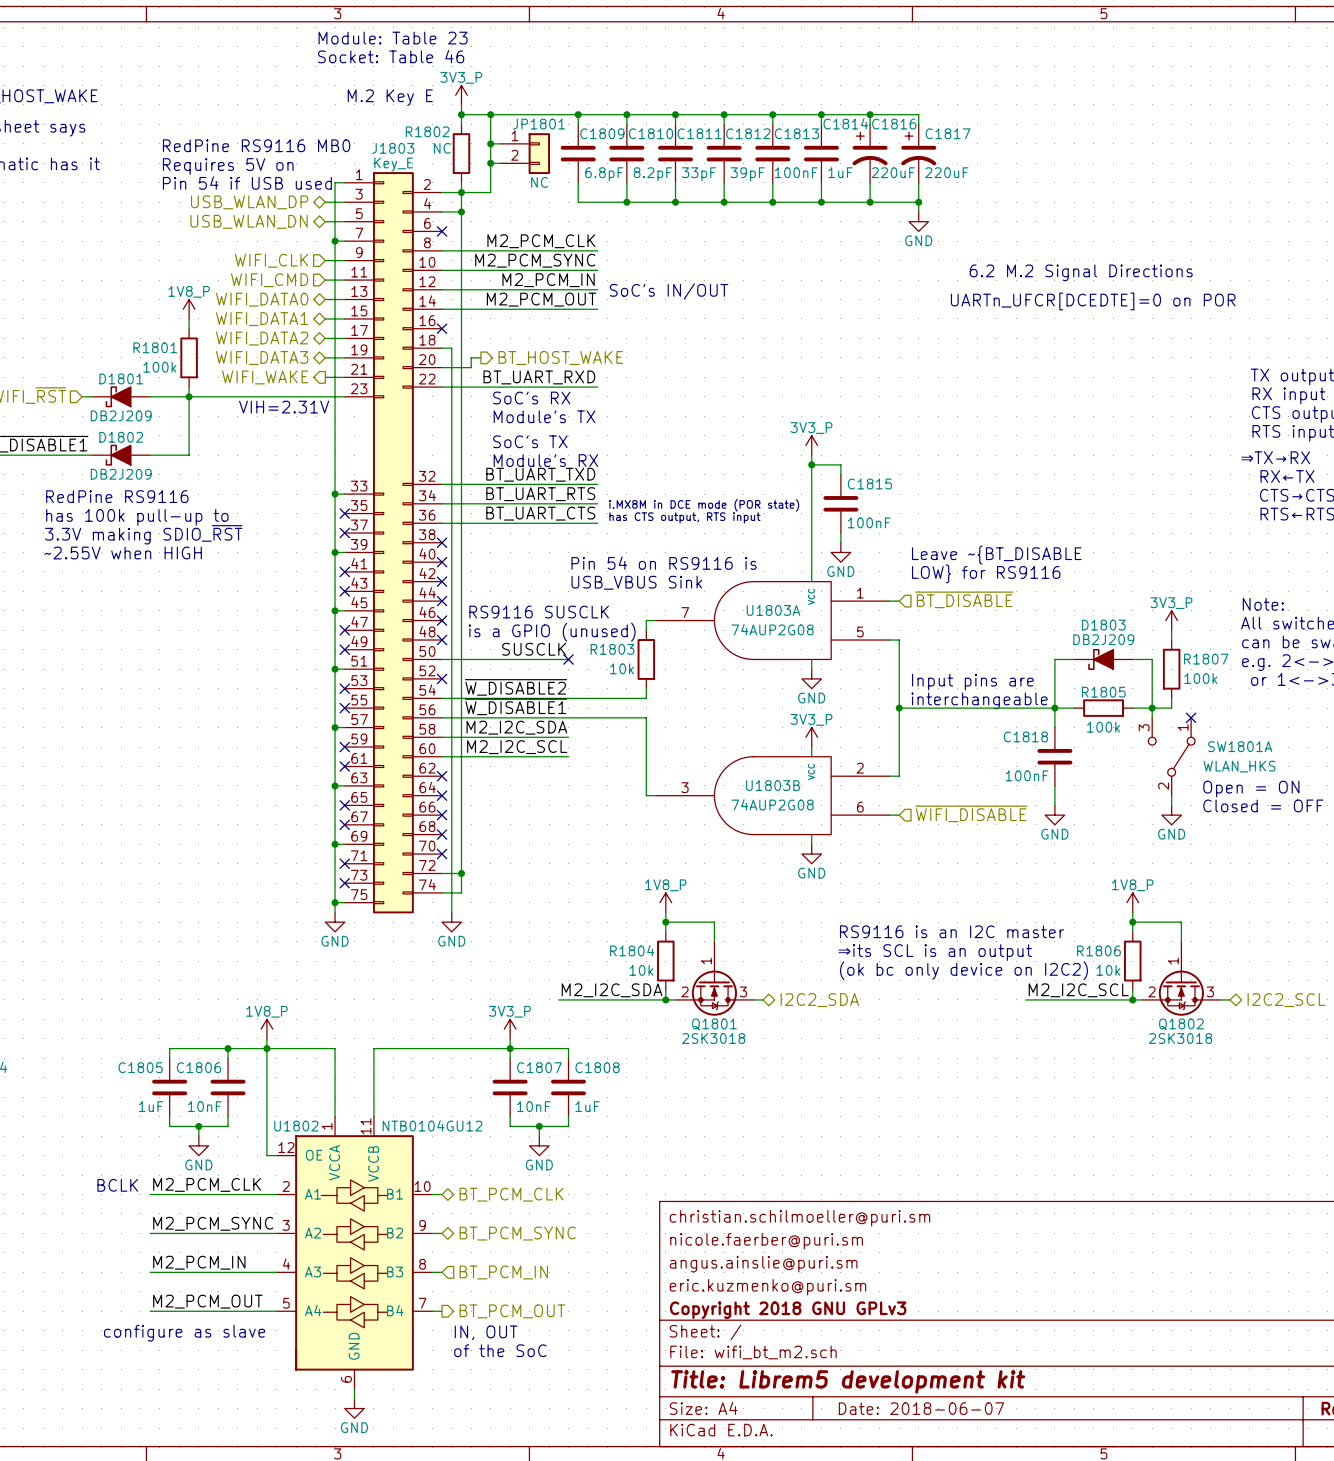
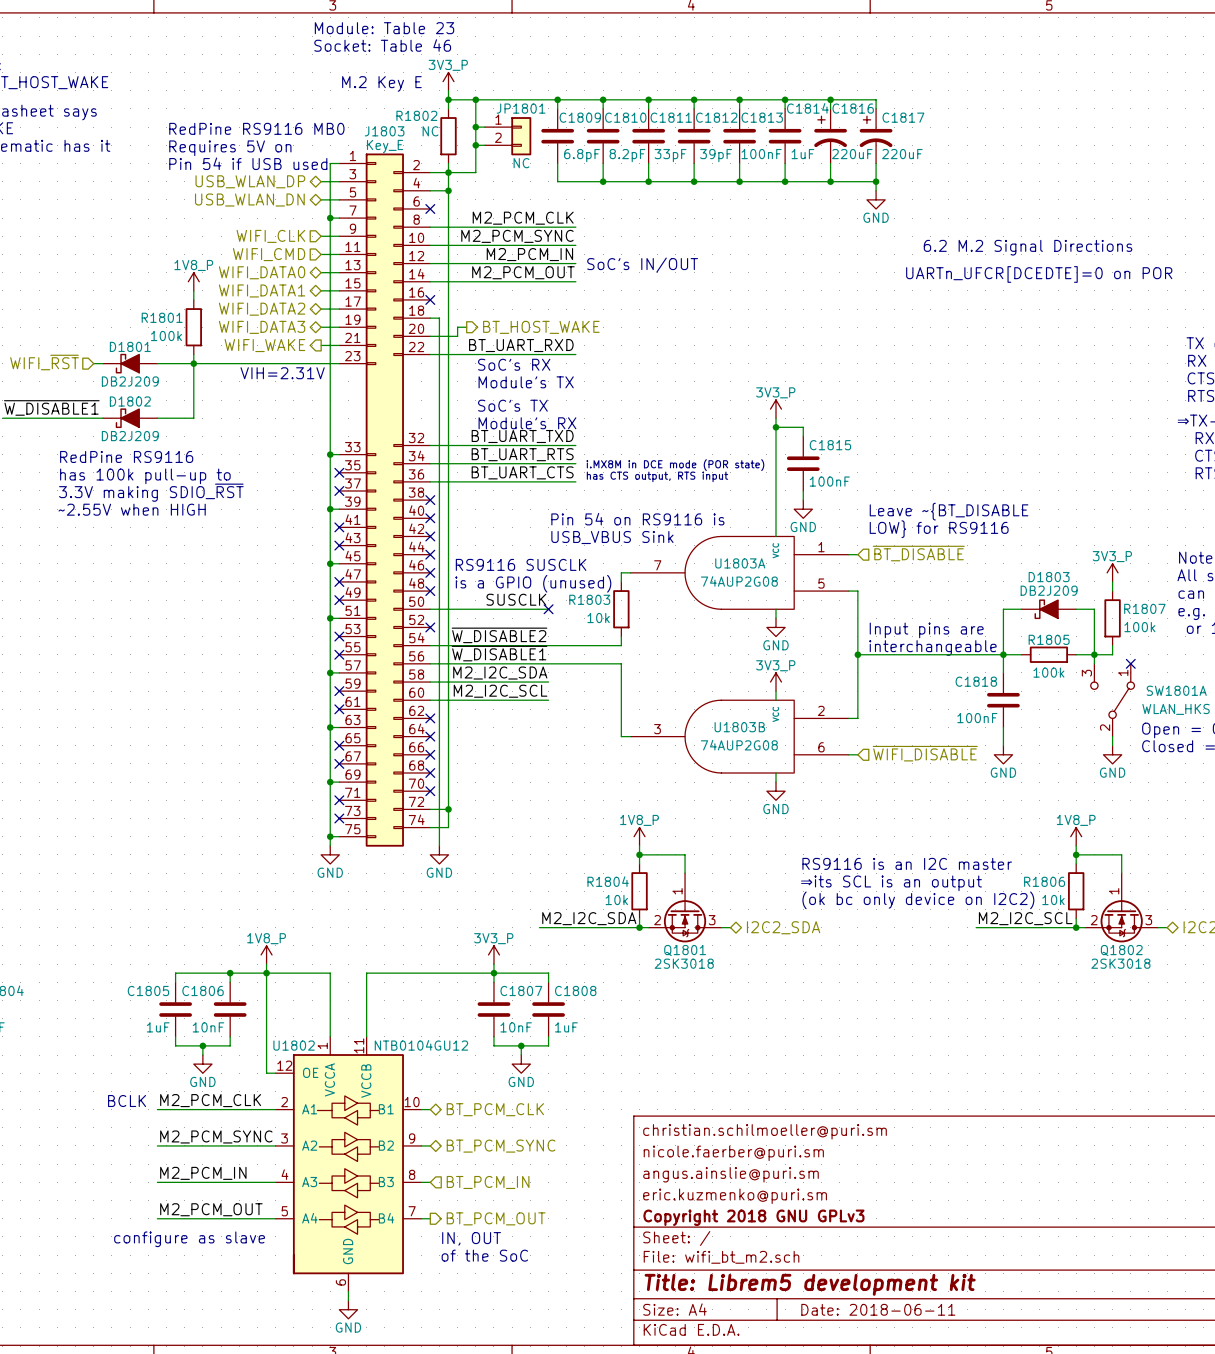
title block: Date: 2018-06-07 (921, 1408) -> Date: 2018-06-11 (878, 1309)

